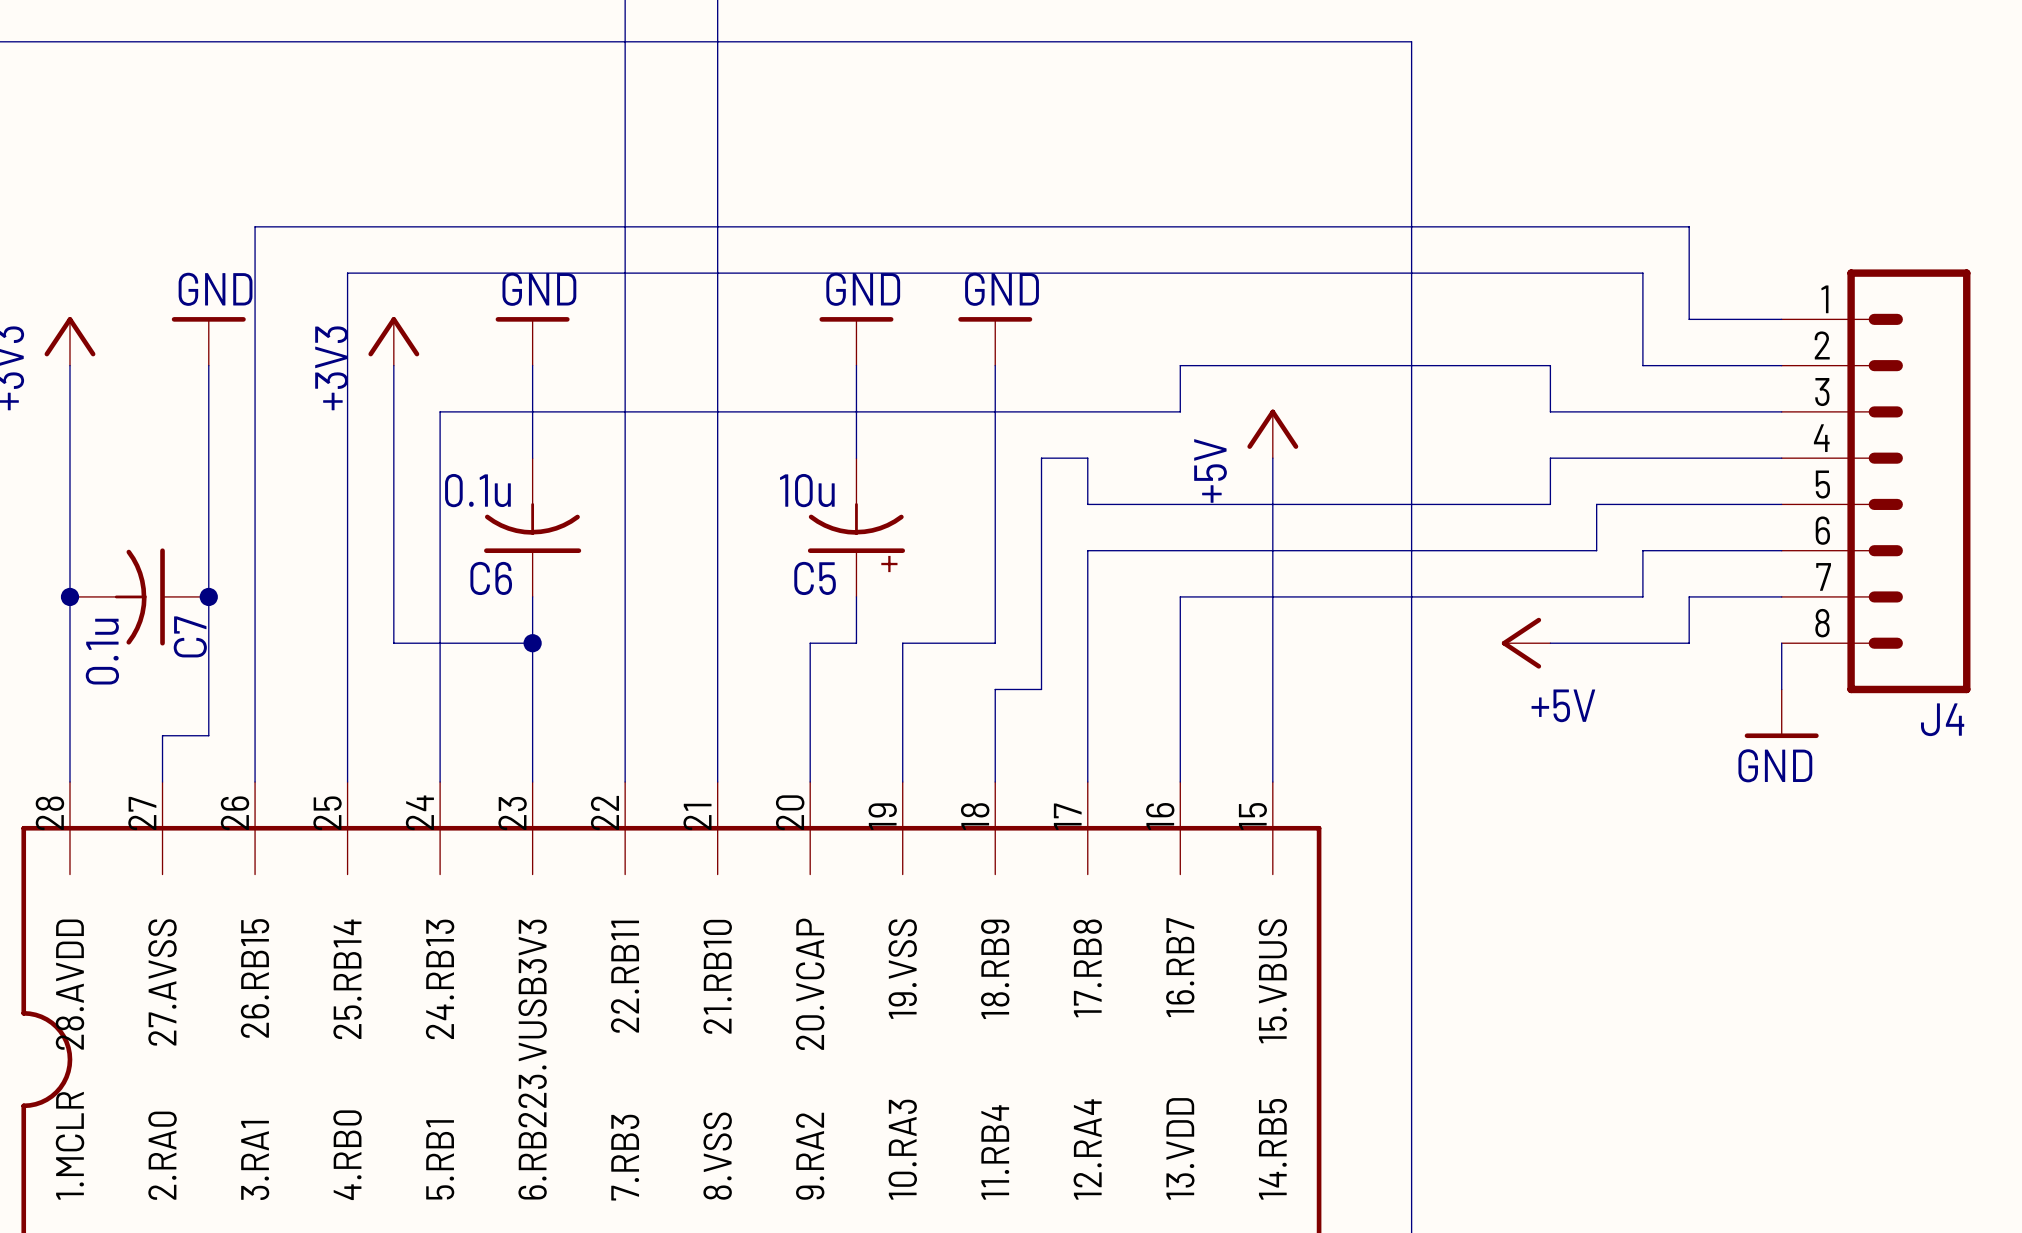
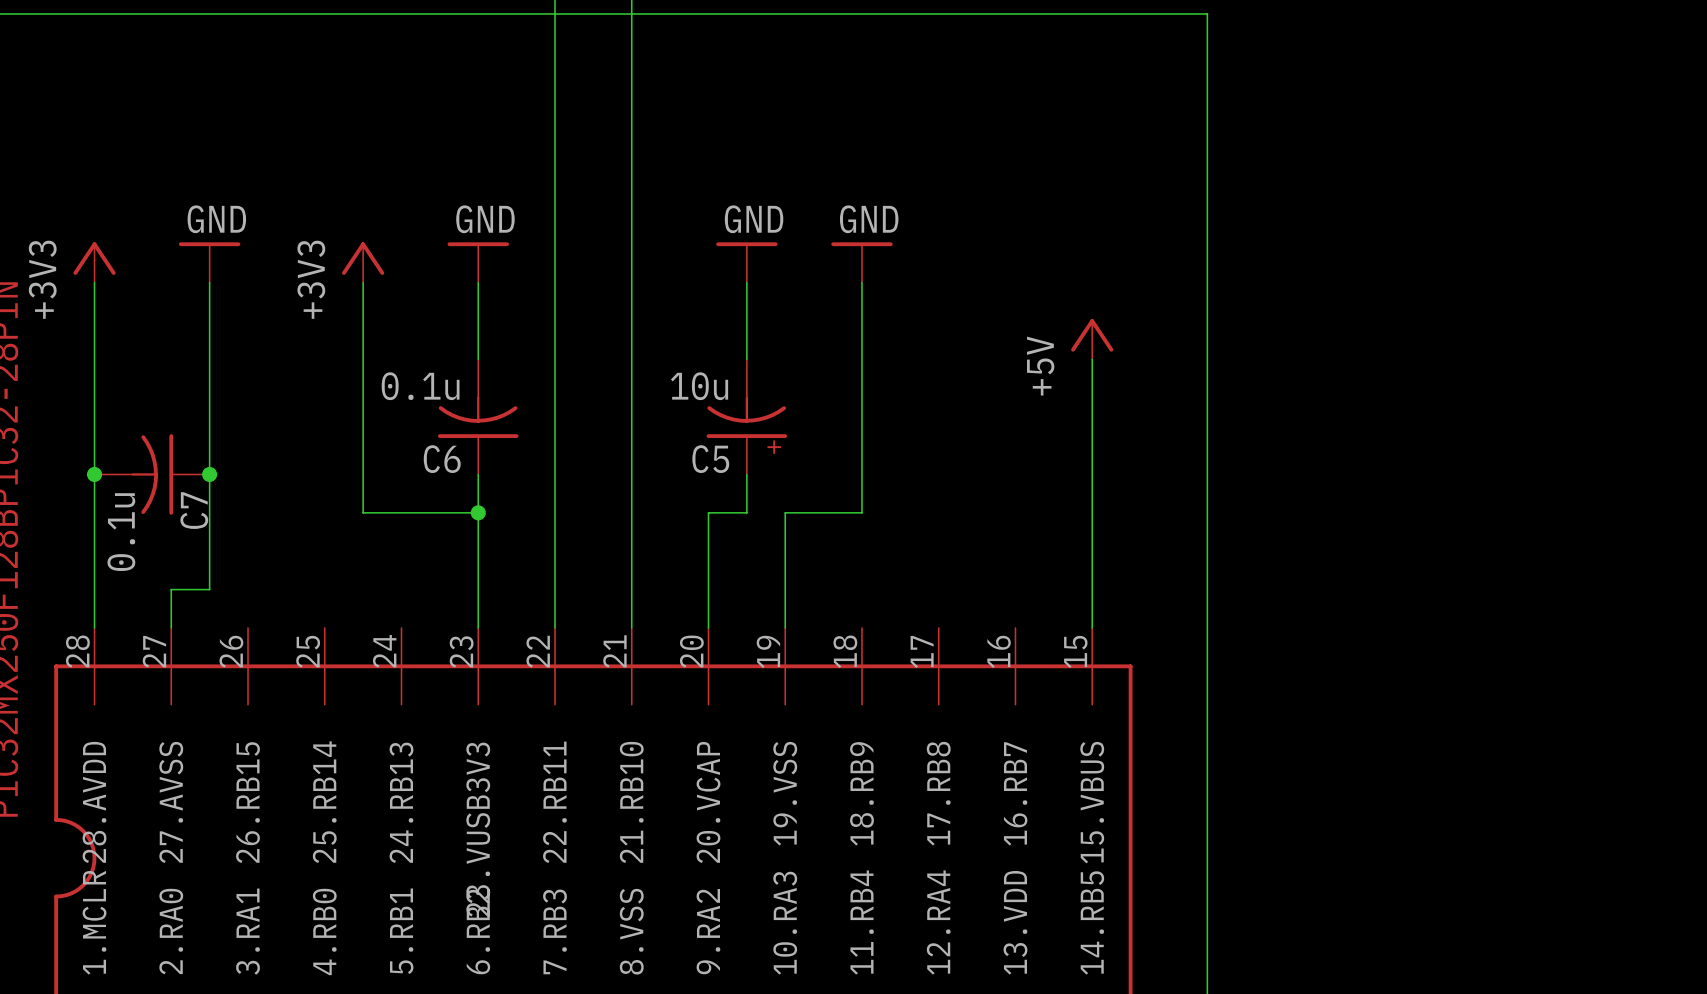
wire: (1781, 319) (1689, 319) (1689, 226) (255, 226) (255, 782) -> none
wire: (1781, 365) (1642, 365) (1642, 273) (347, 273) (347, 782) -> none
wire: (1781, 411) (1550, 411) (1550, 365) (1180, 365) (1180, 411) (440, 411) (440, 782) -> none
wire: (1781, 458) (1550, 458) (1550, 504) (1087, 504) (1087, 458) (1041, 458) (1041, 689) (995, 689) (995, 782) -> none
J4: (1876, 481) -> none
wire: (1781, 504) (1596, 504) (1596, 550) (1087, 550) (1087, 782) -> none
wire: (1781, 550) (1642, 550) (1642, 596) (1180, 596) (1180, 782) -> none
wire: (1781, 596) (1689, 596) (1689, 643) (1550, 643) -> none
power symbol: +5V (1526, 643) -> none
wire: (1781, 643) (1781, 689) -> none
power symbol: GND (1781, 713) -> none

